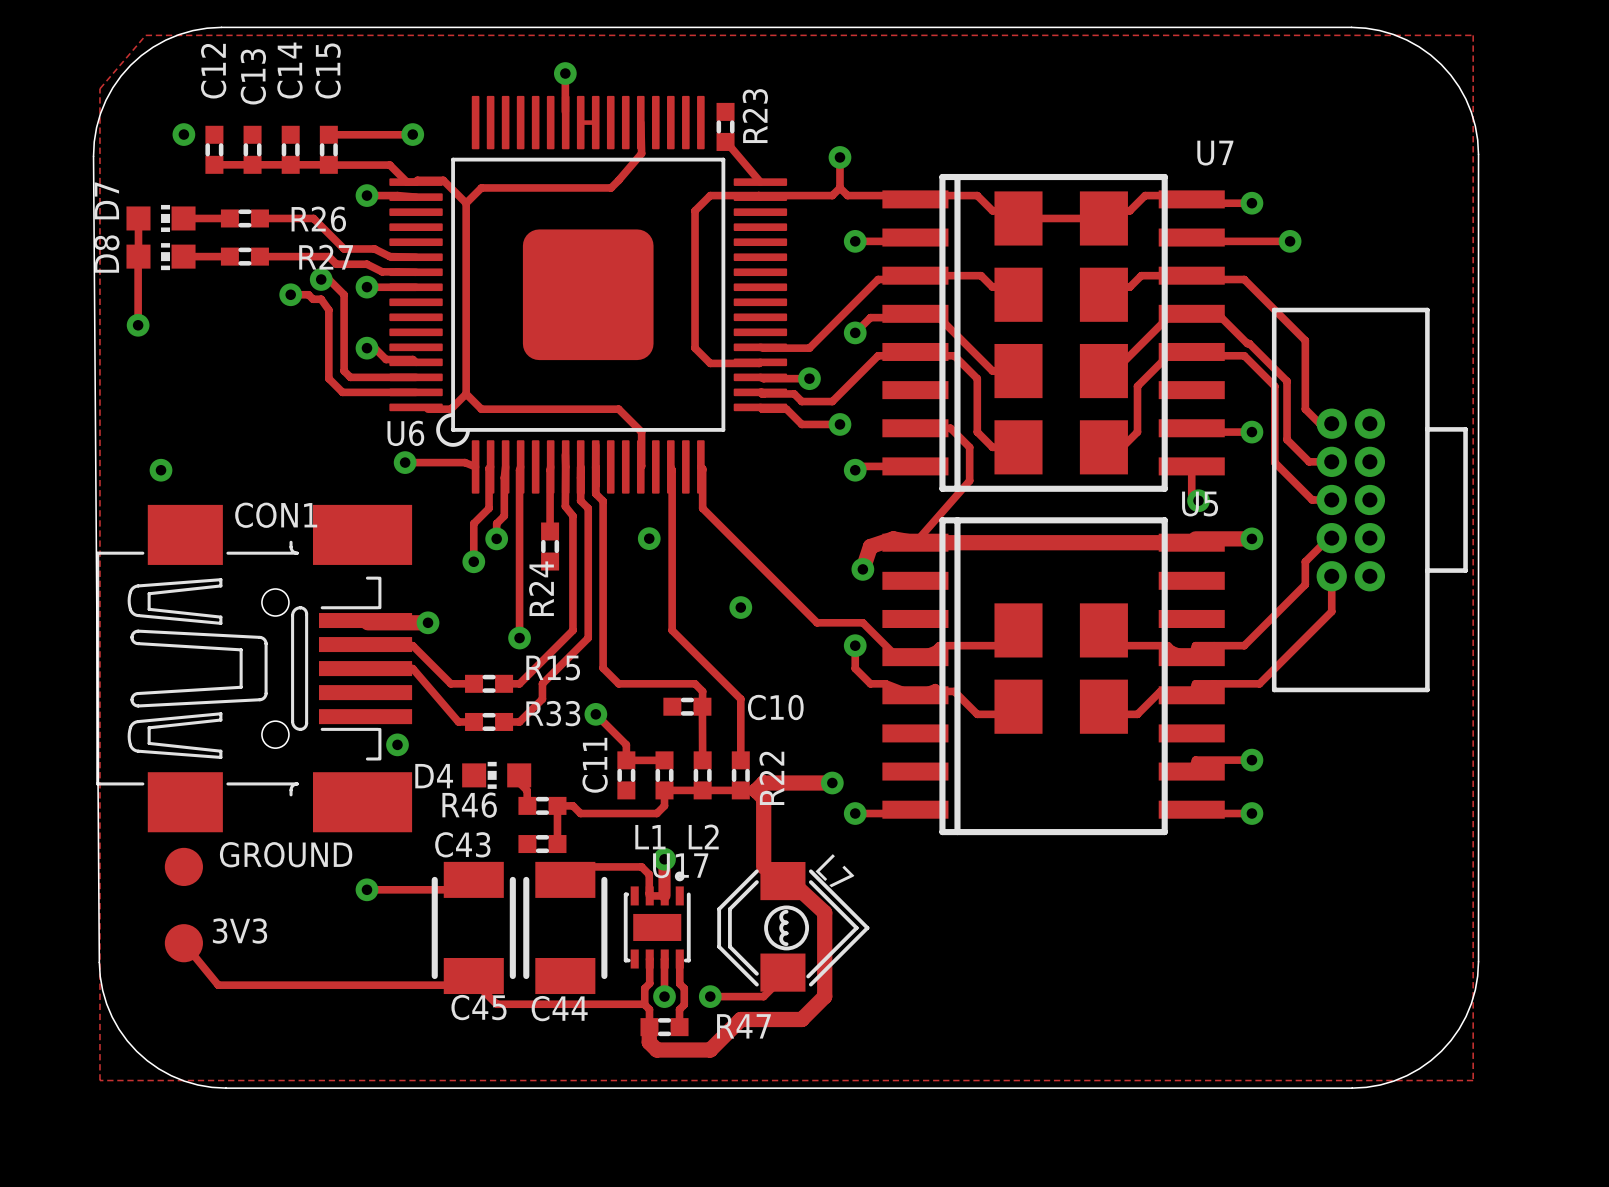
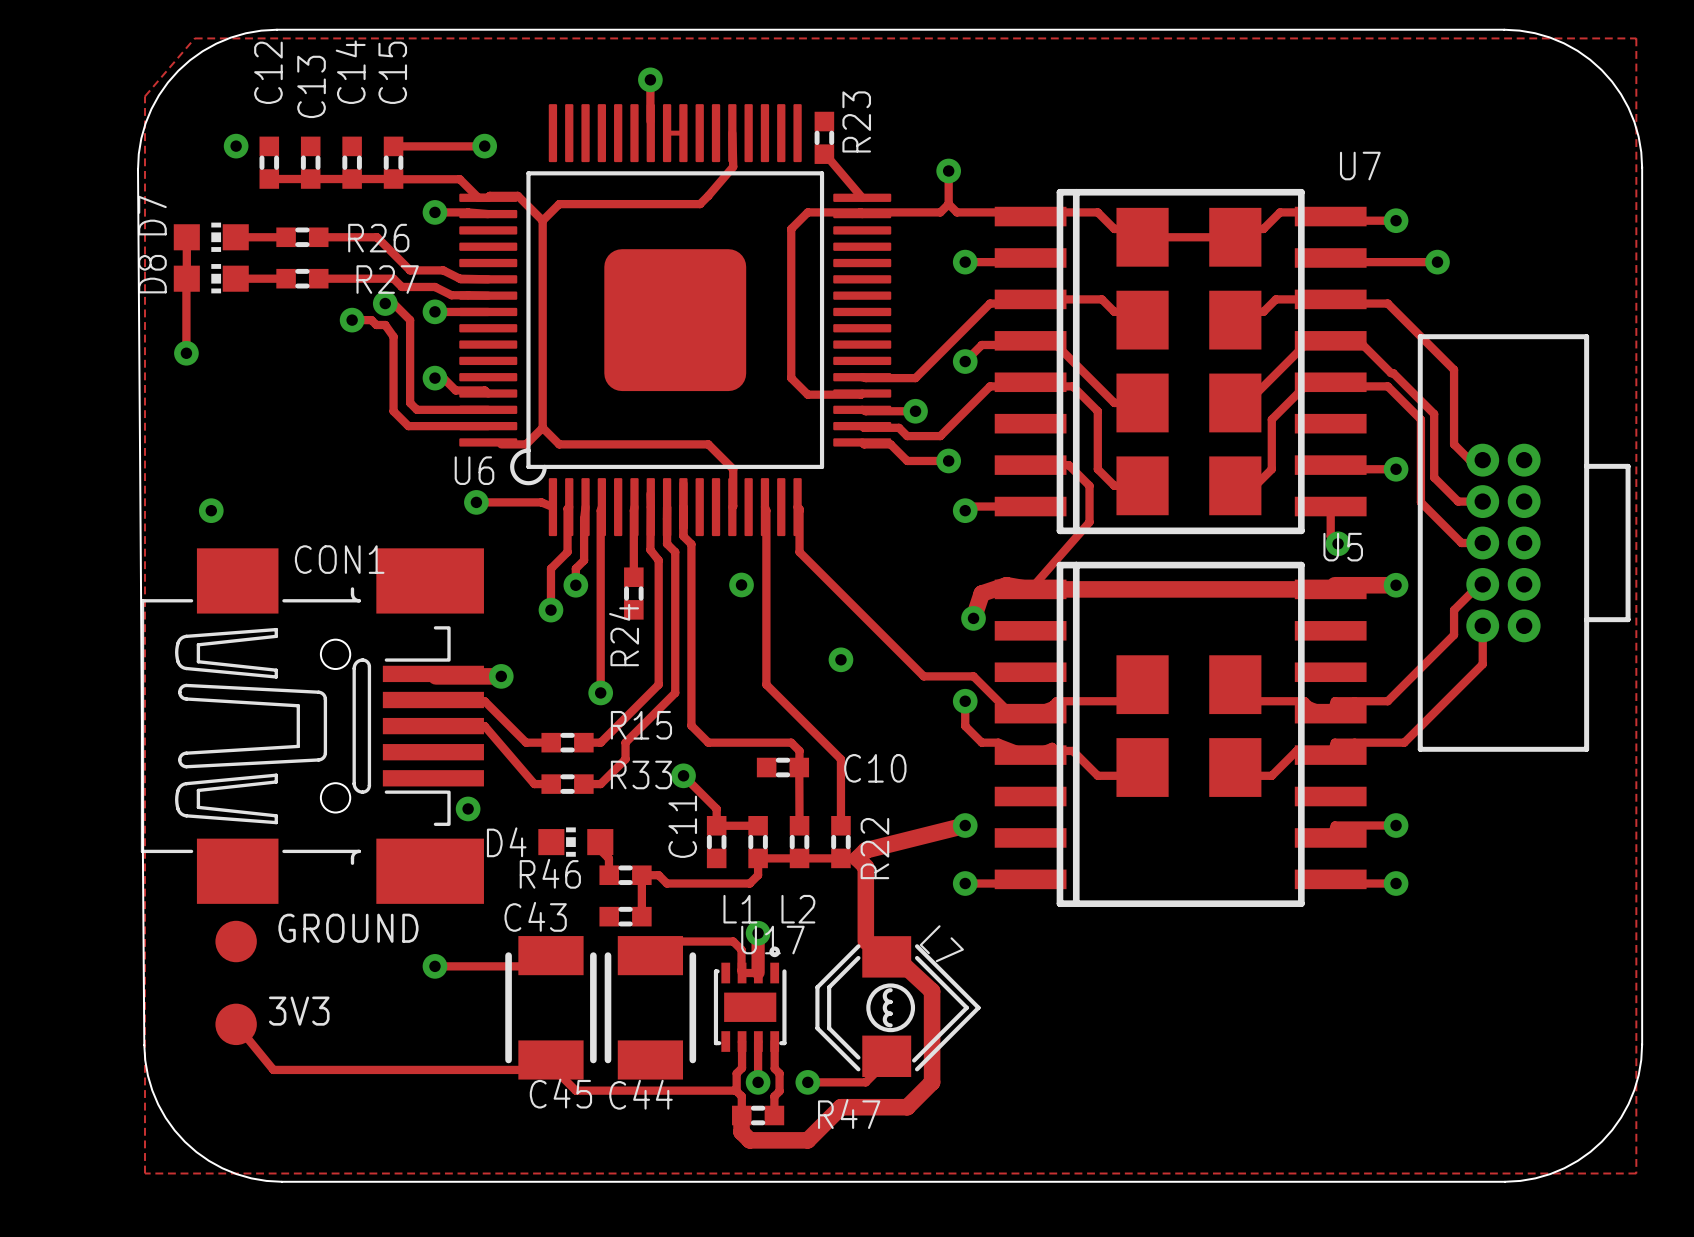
track: (763, 783) (832, 783) -> (865, 850) (965, 825)
via position: (832, 783) -> (965, 825)

